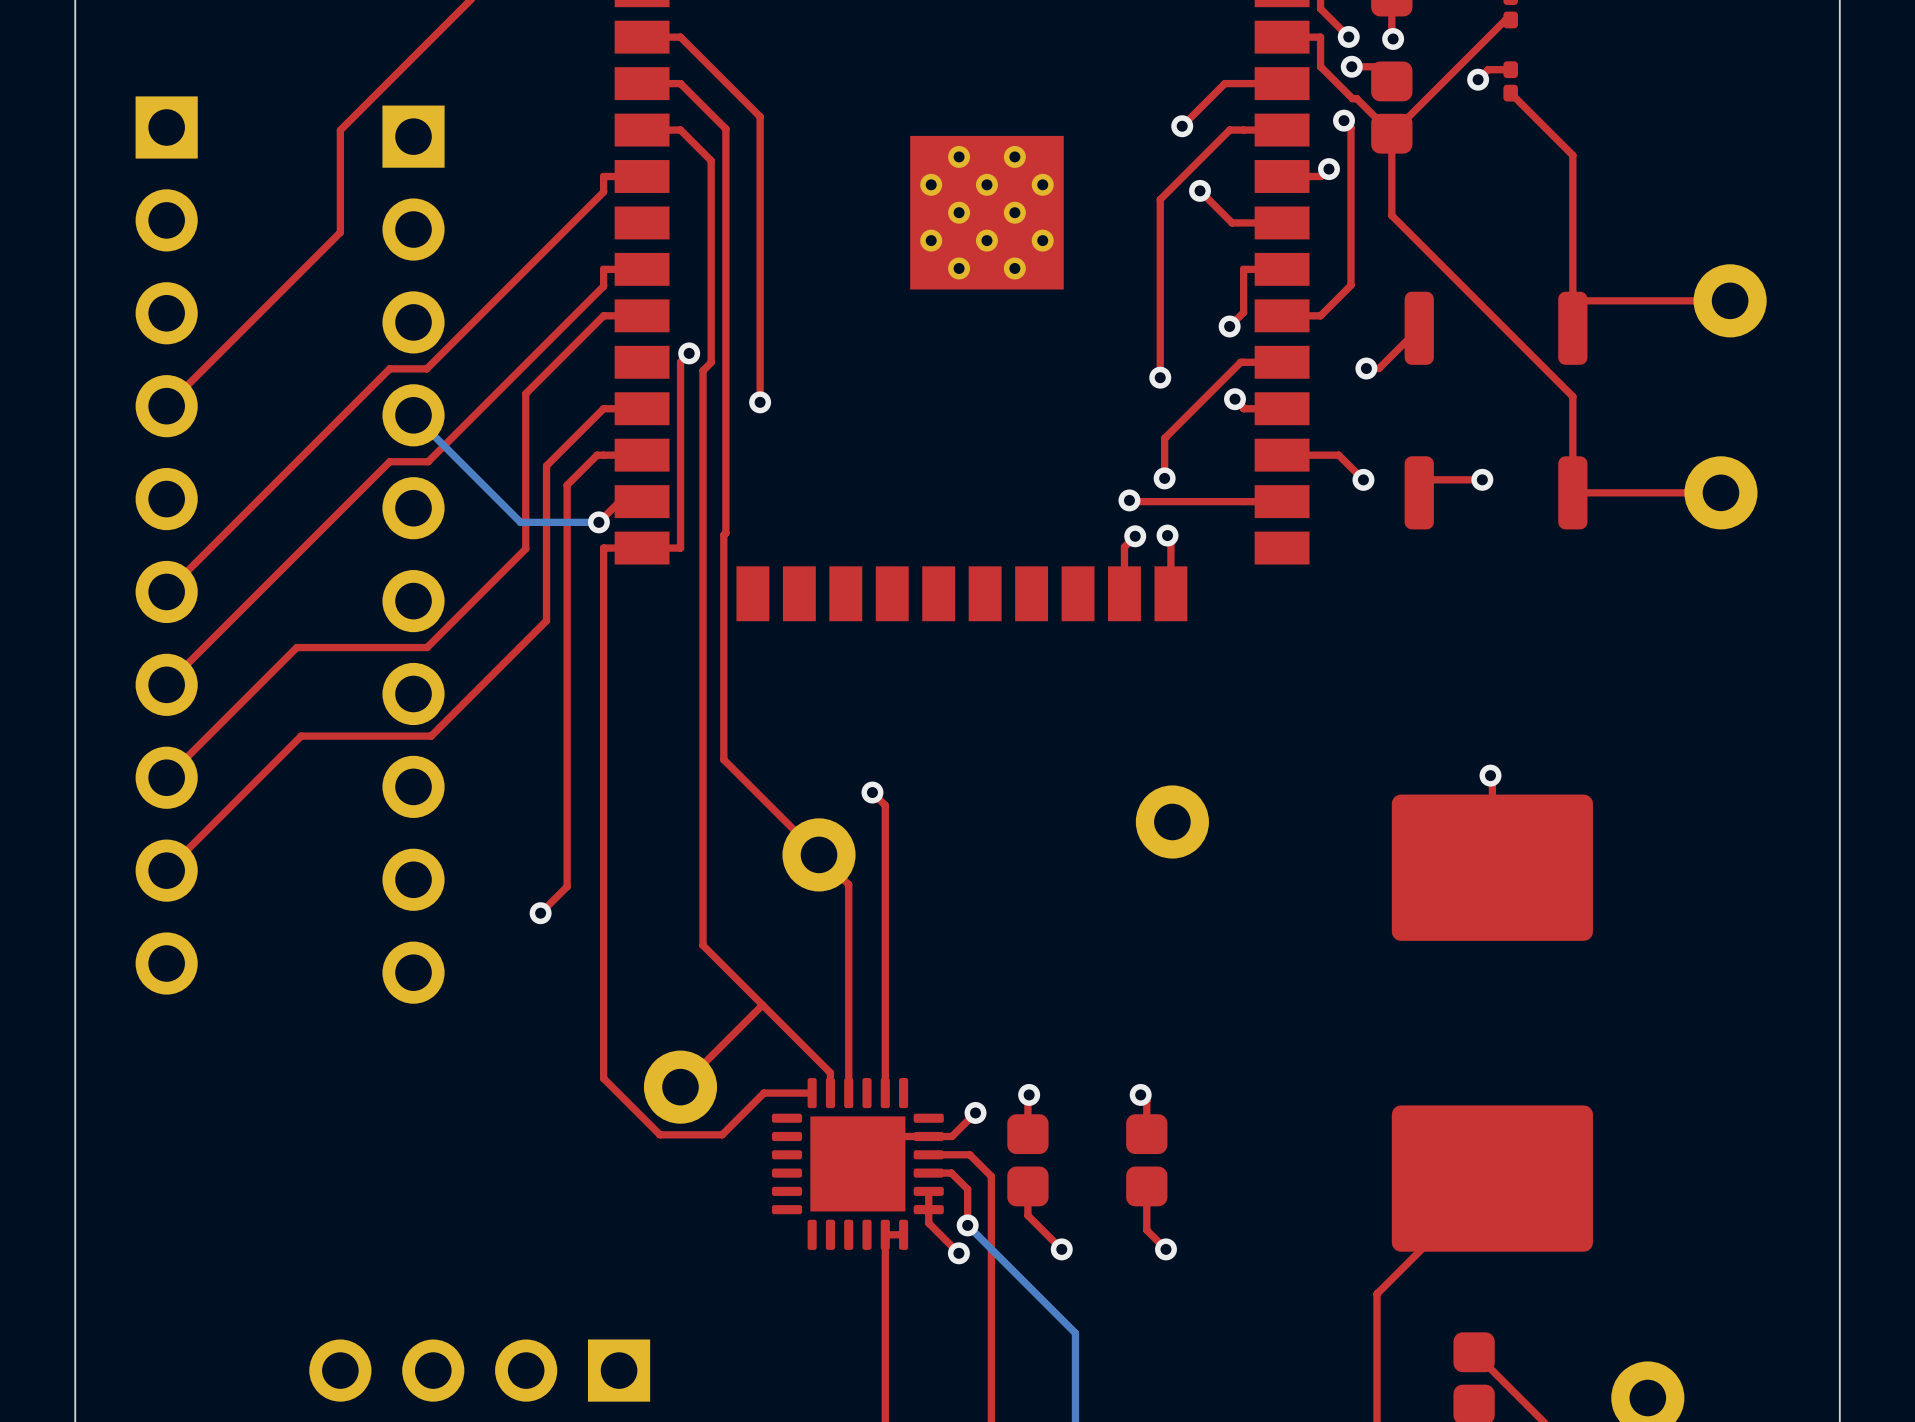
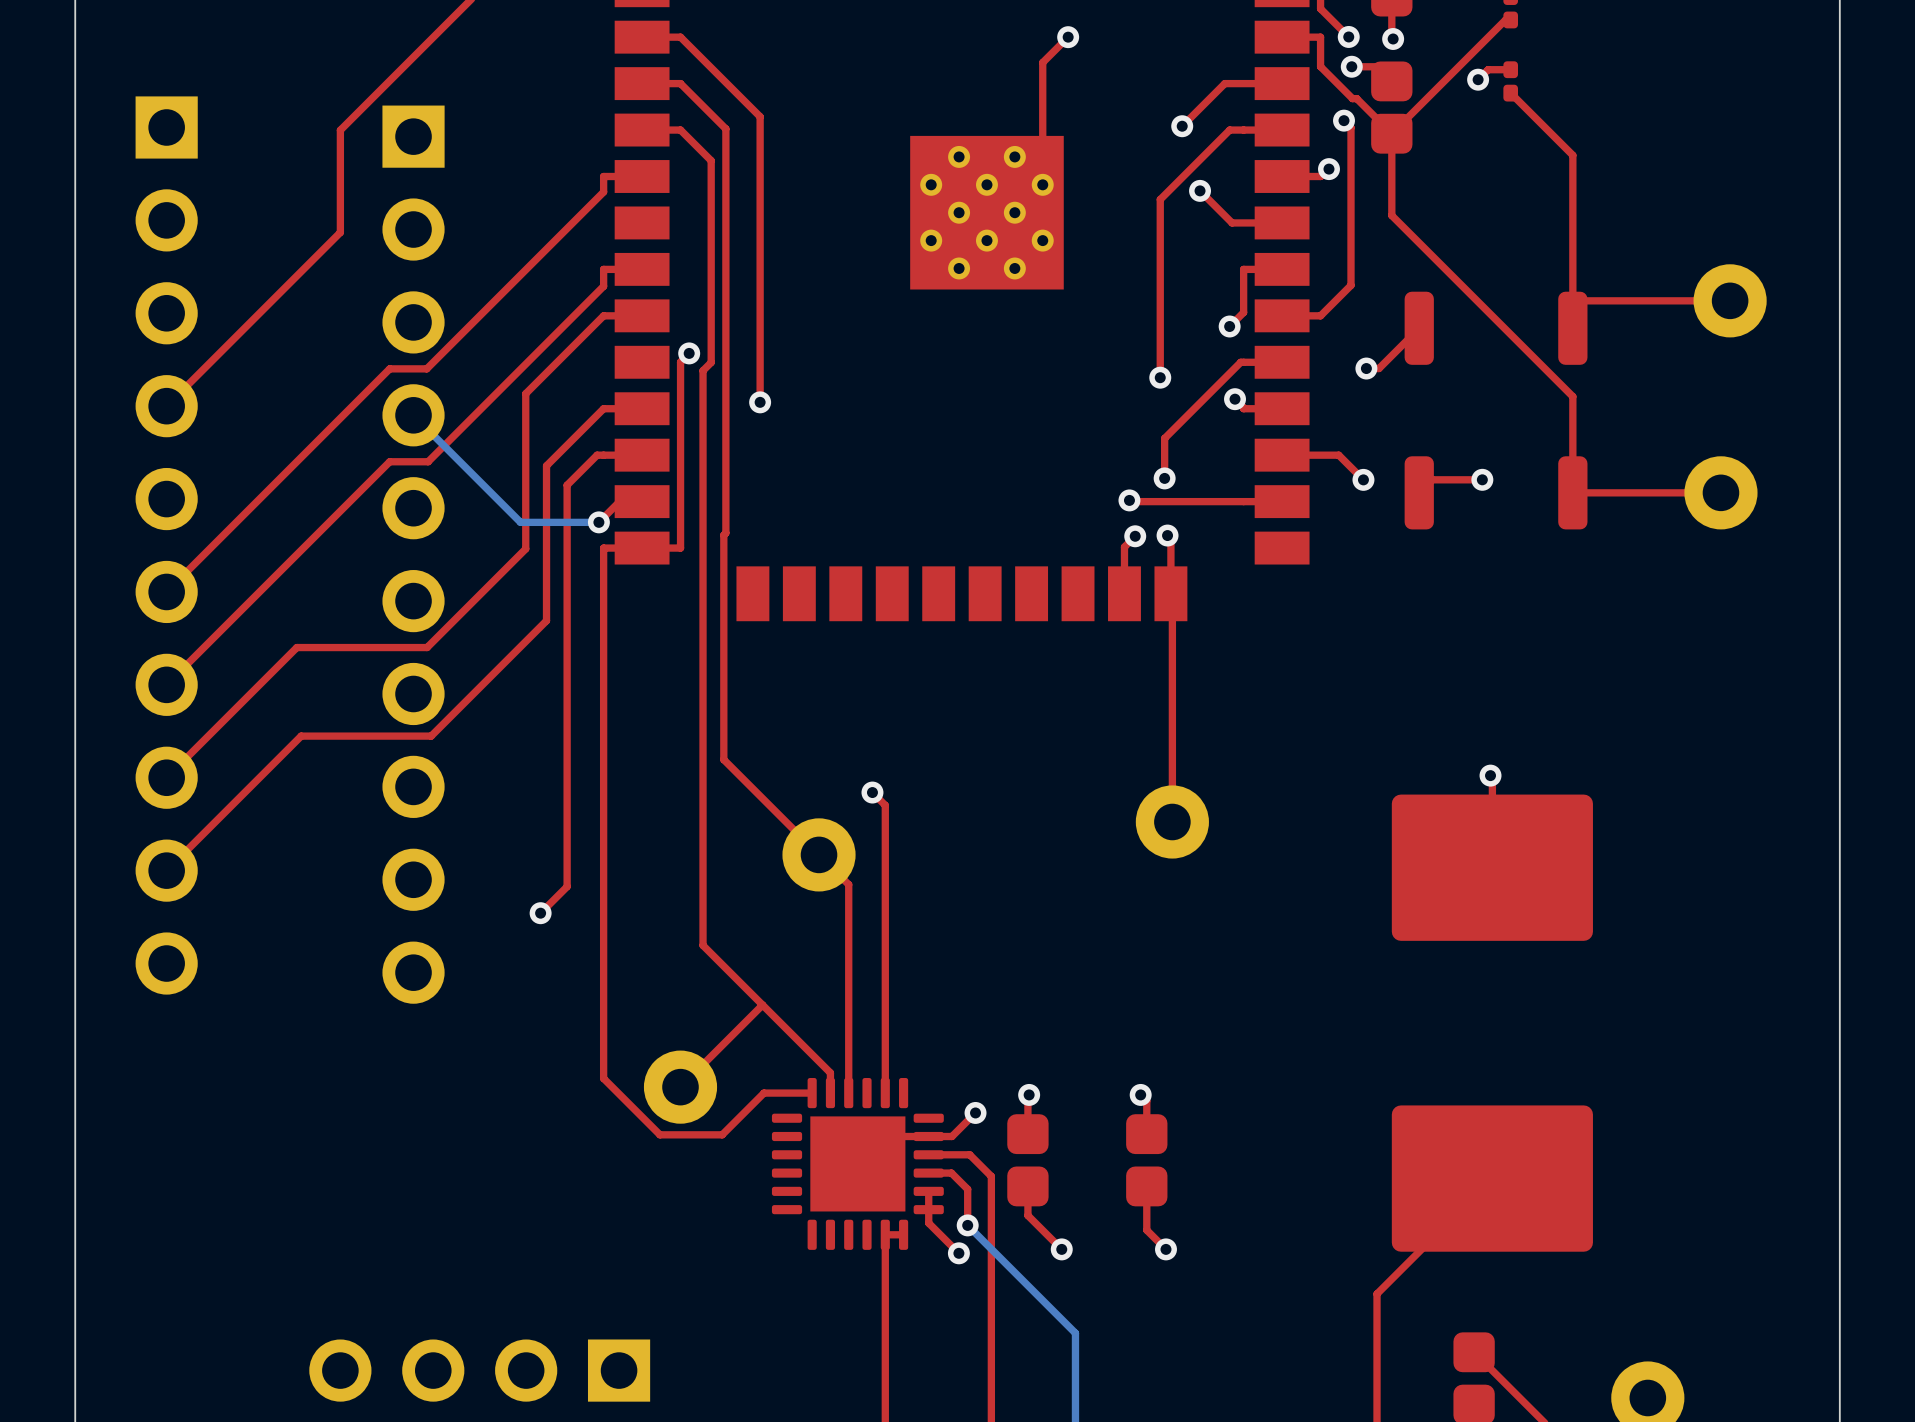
top track: none -> (1068, 37) (1042, 62) (1042, 156)
via: none -> (1068, 37)
top track: none -> (1170, 593) (1172, 821)

